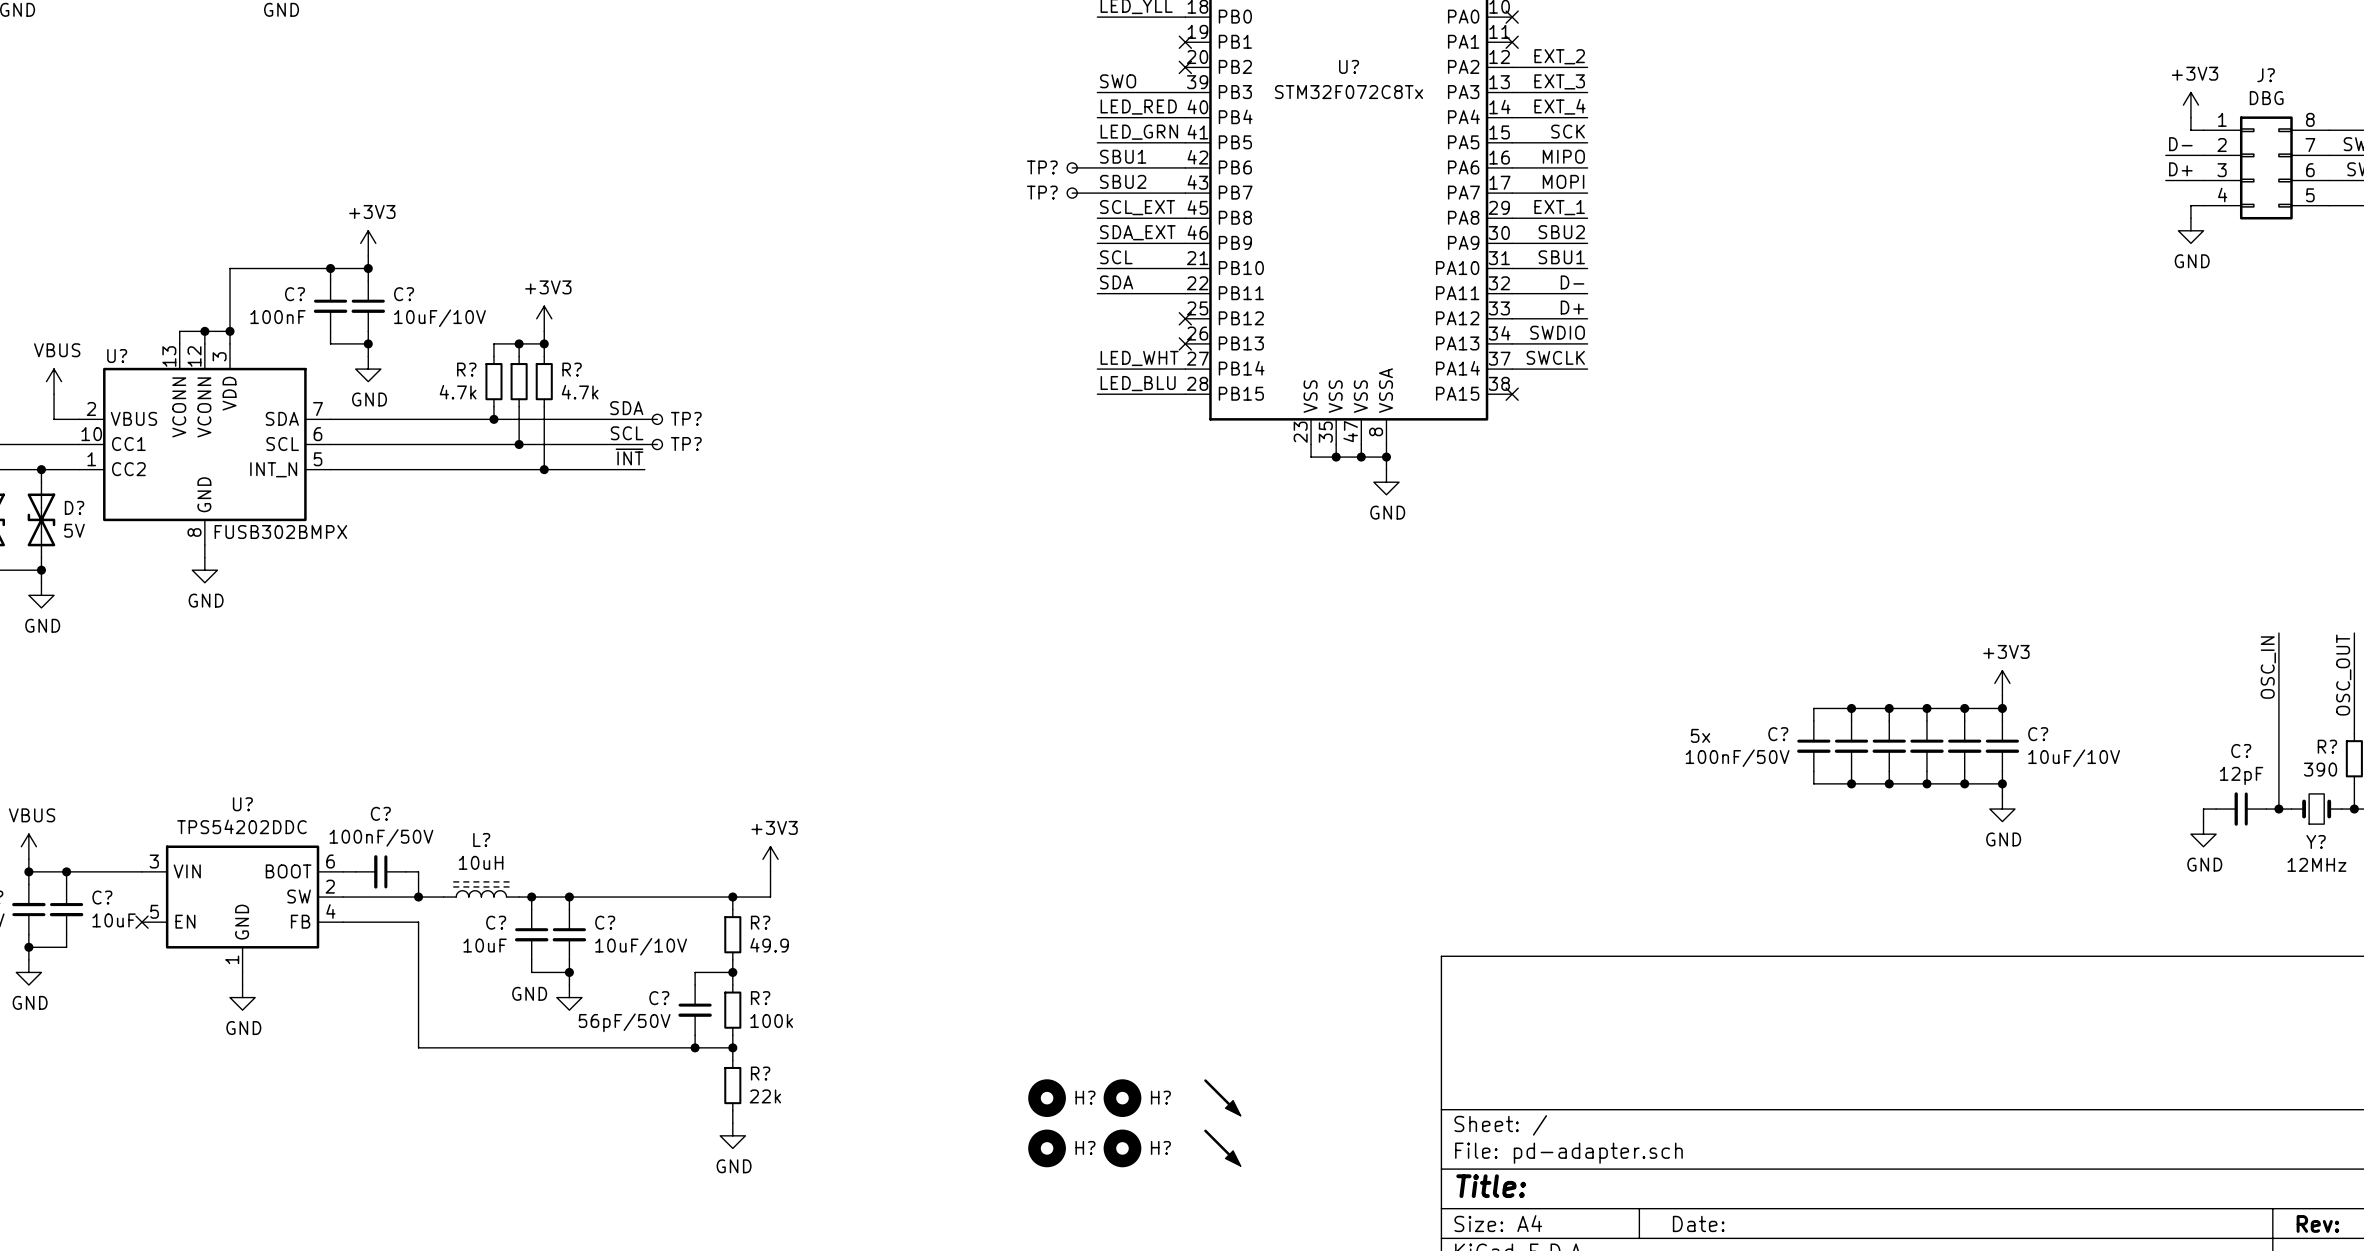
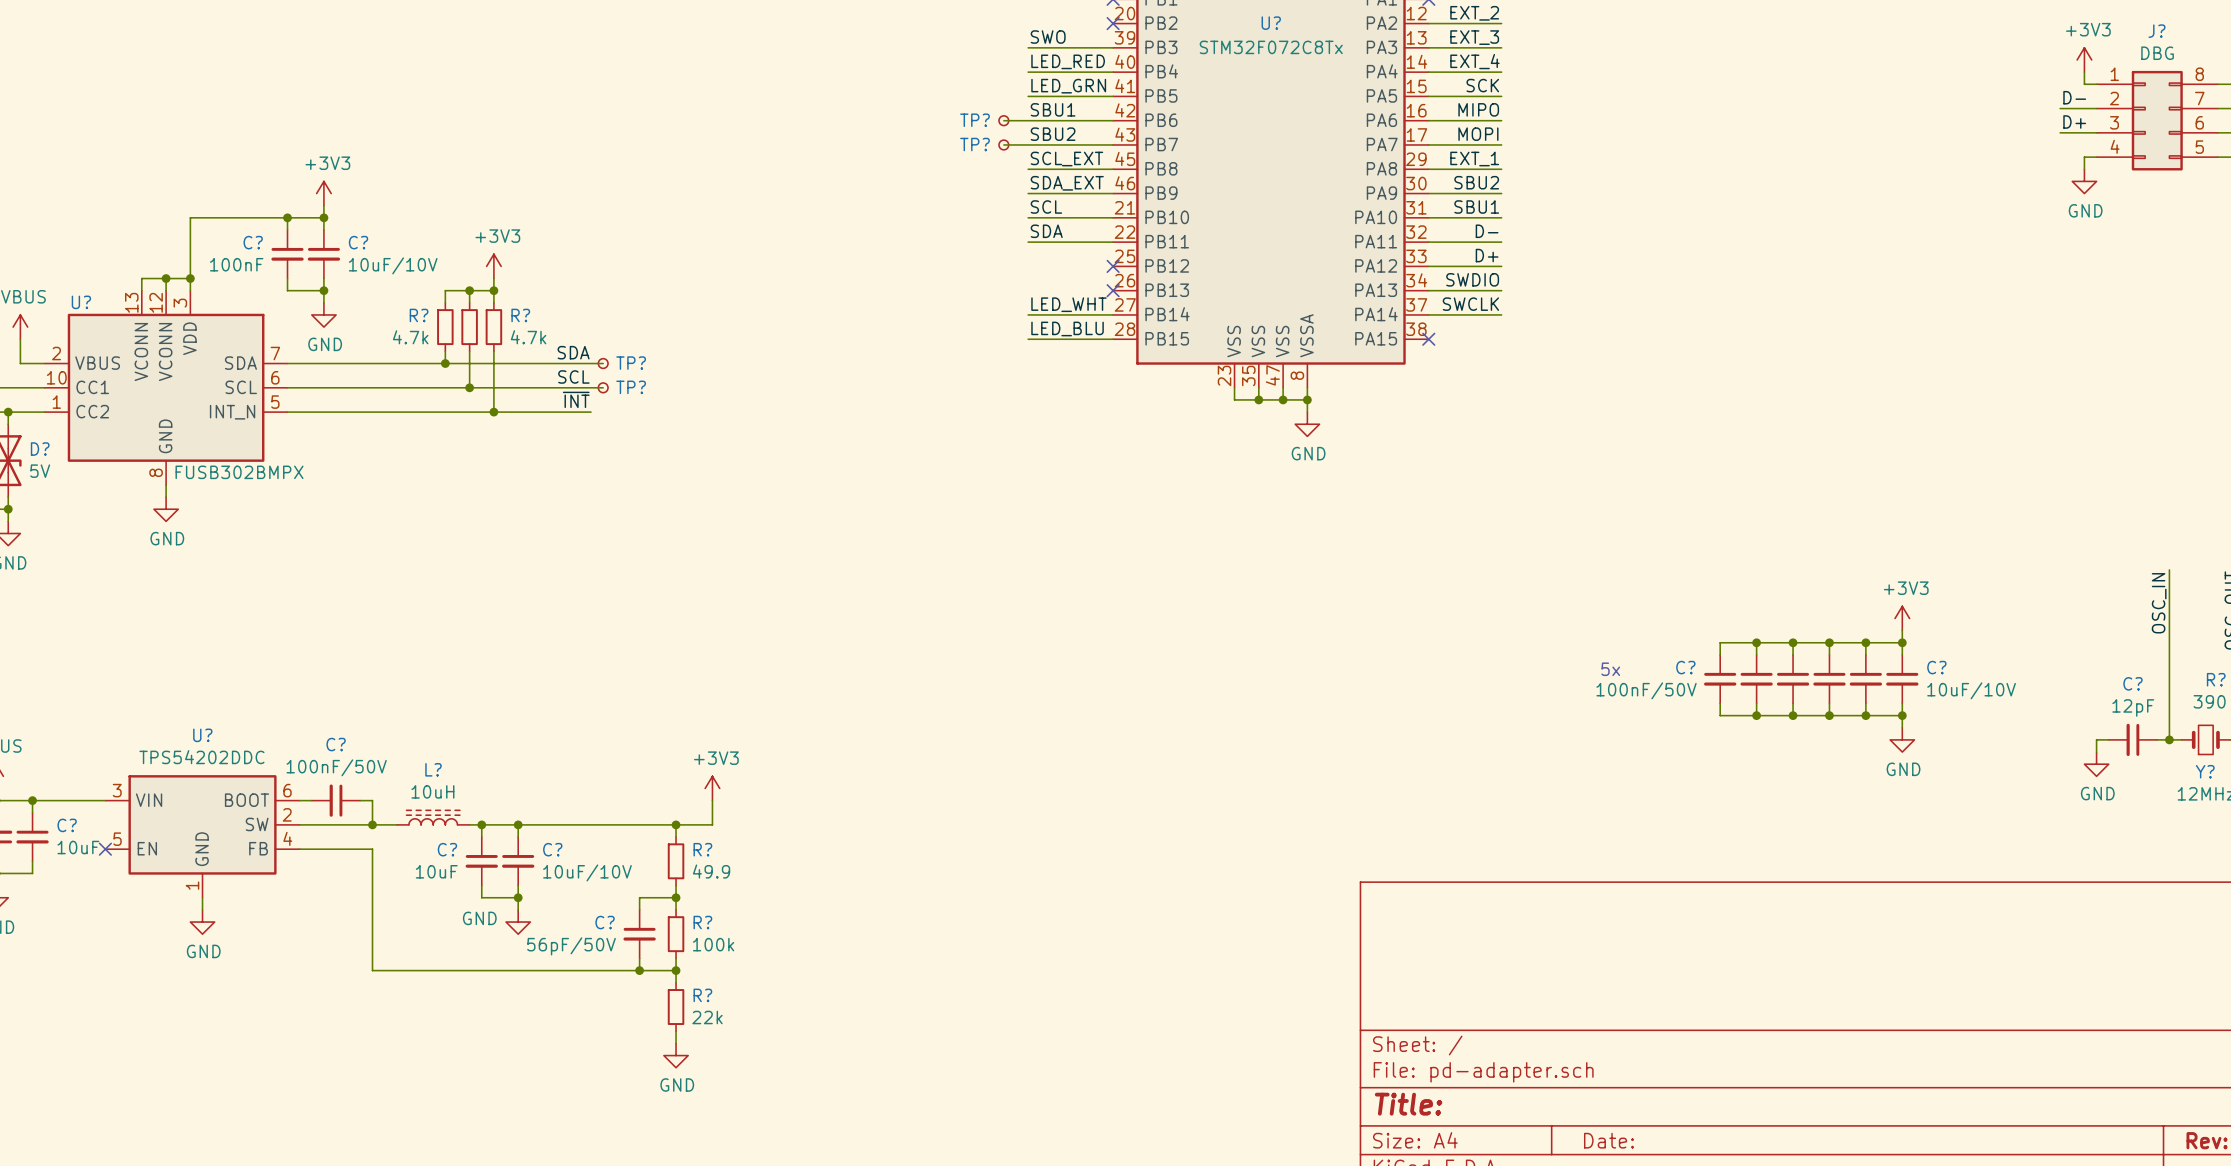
power symbol: (1222, 1097) -> none
H?: (1047, 1098) -> none
H?: (1122, 1098) -> none
power symbol: (1222, 1147) -> none
H?: (1047, 1148) -> none
H?: (1122, 1148) -> none

